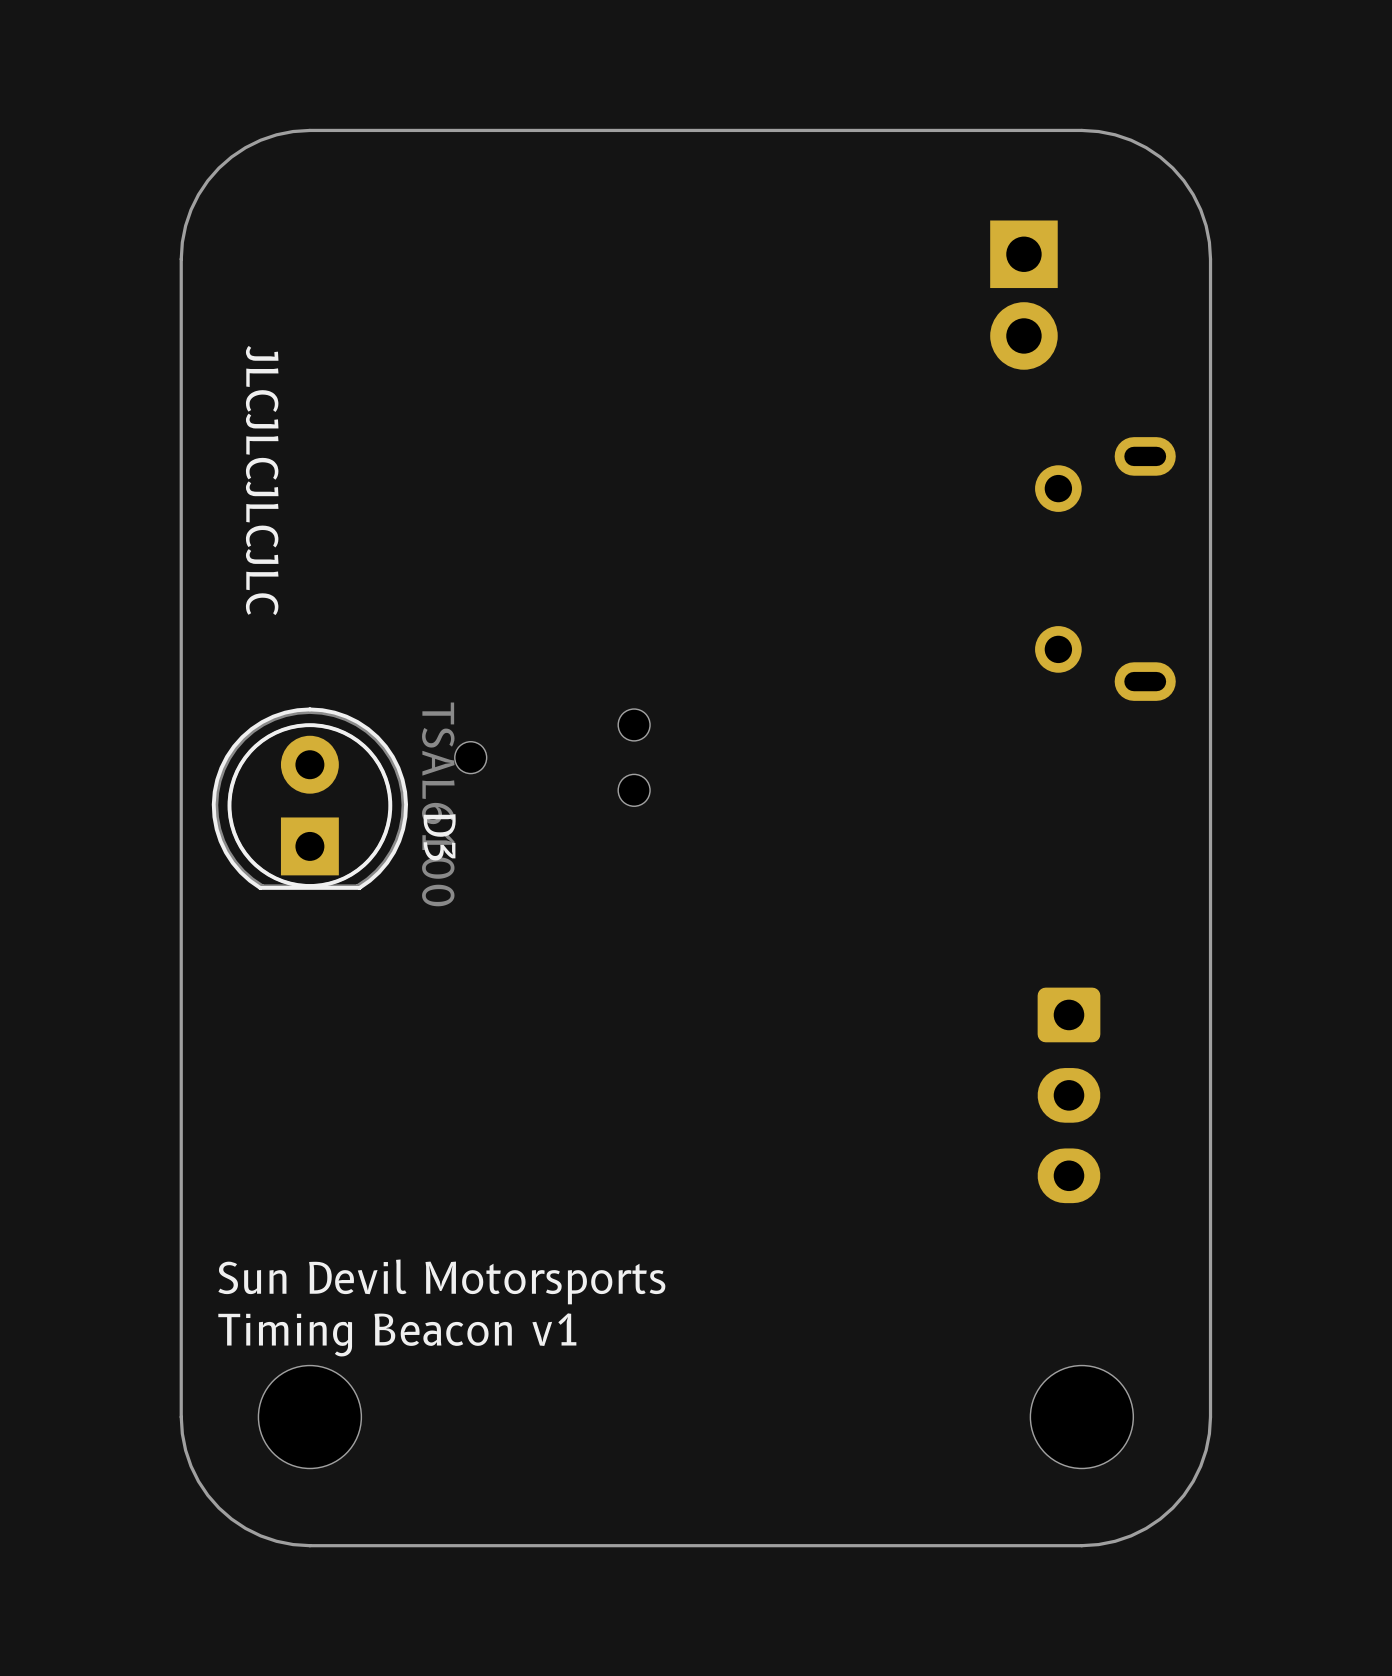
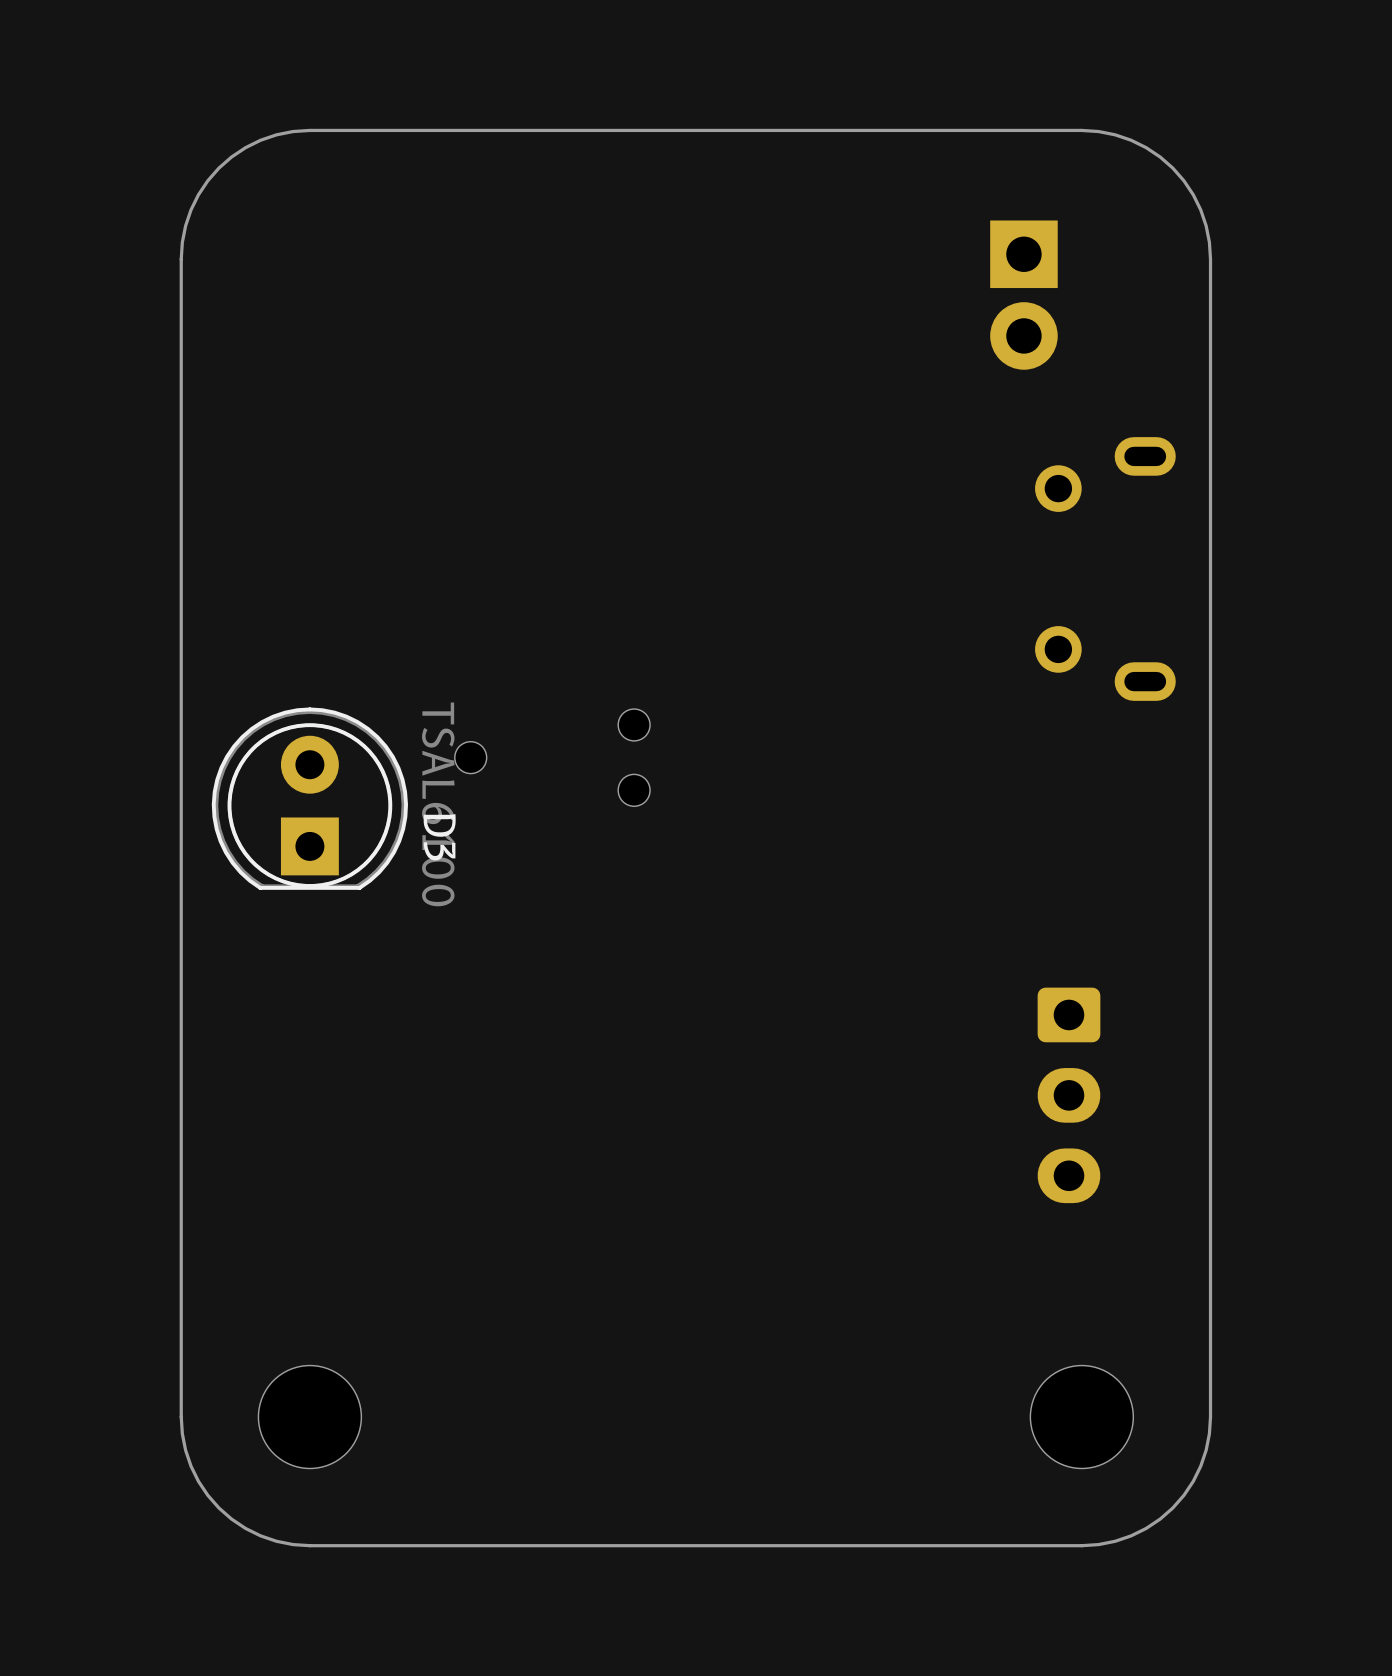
text: JLCJLCJLCJLC (262, 480) -> none
text: Sun Devil Motorsports (441, 1281) -> none
text: Timing Beacon v1 (397, 1334) -> none

